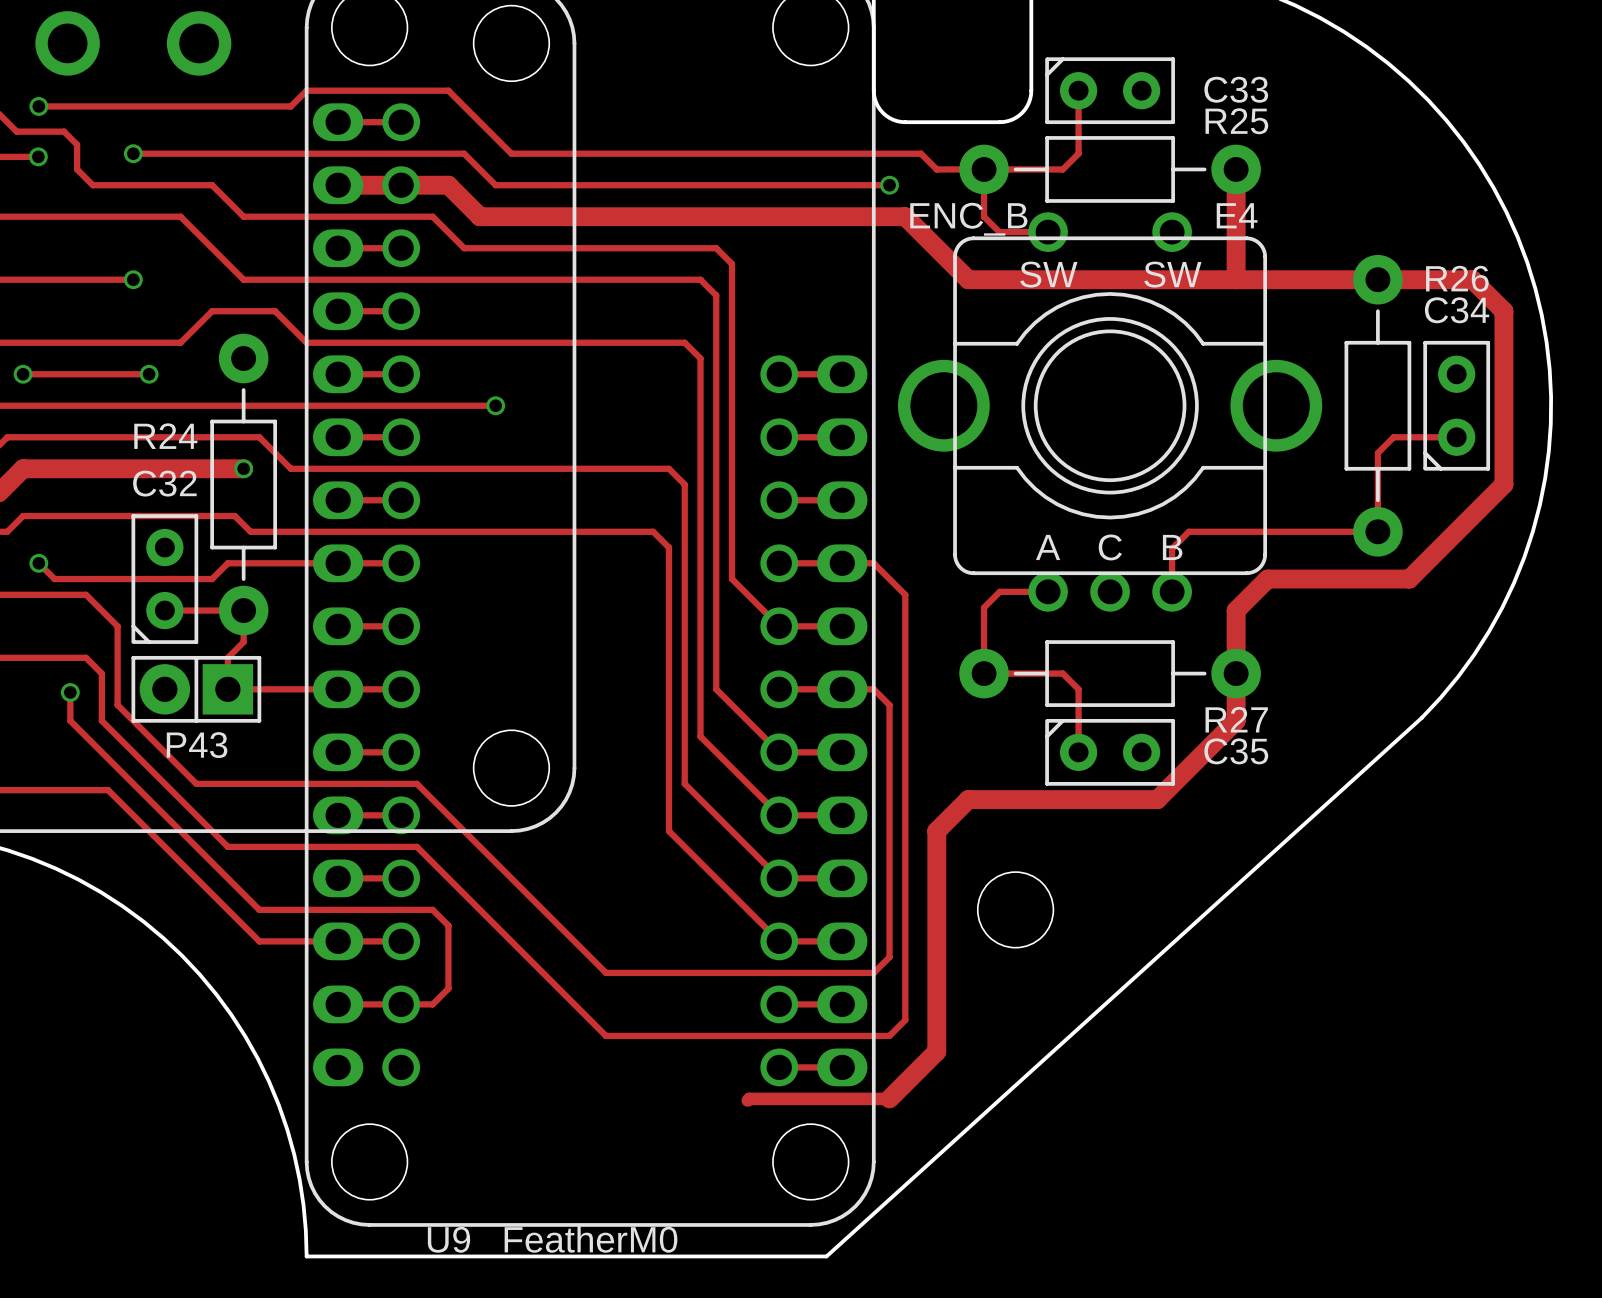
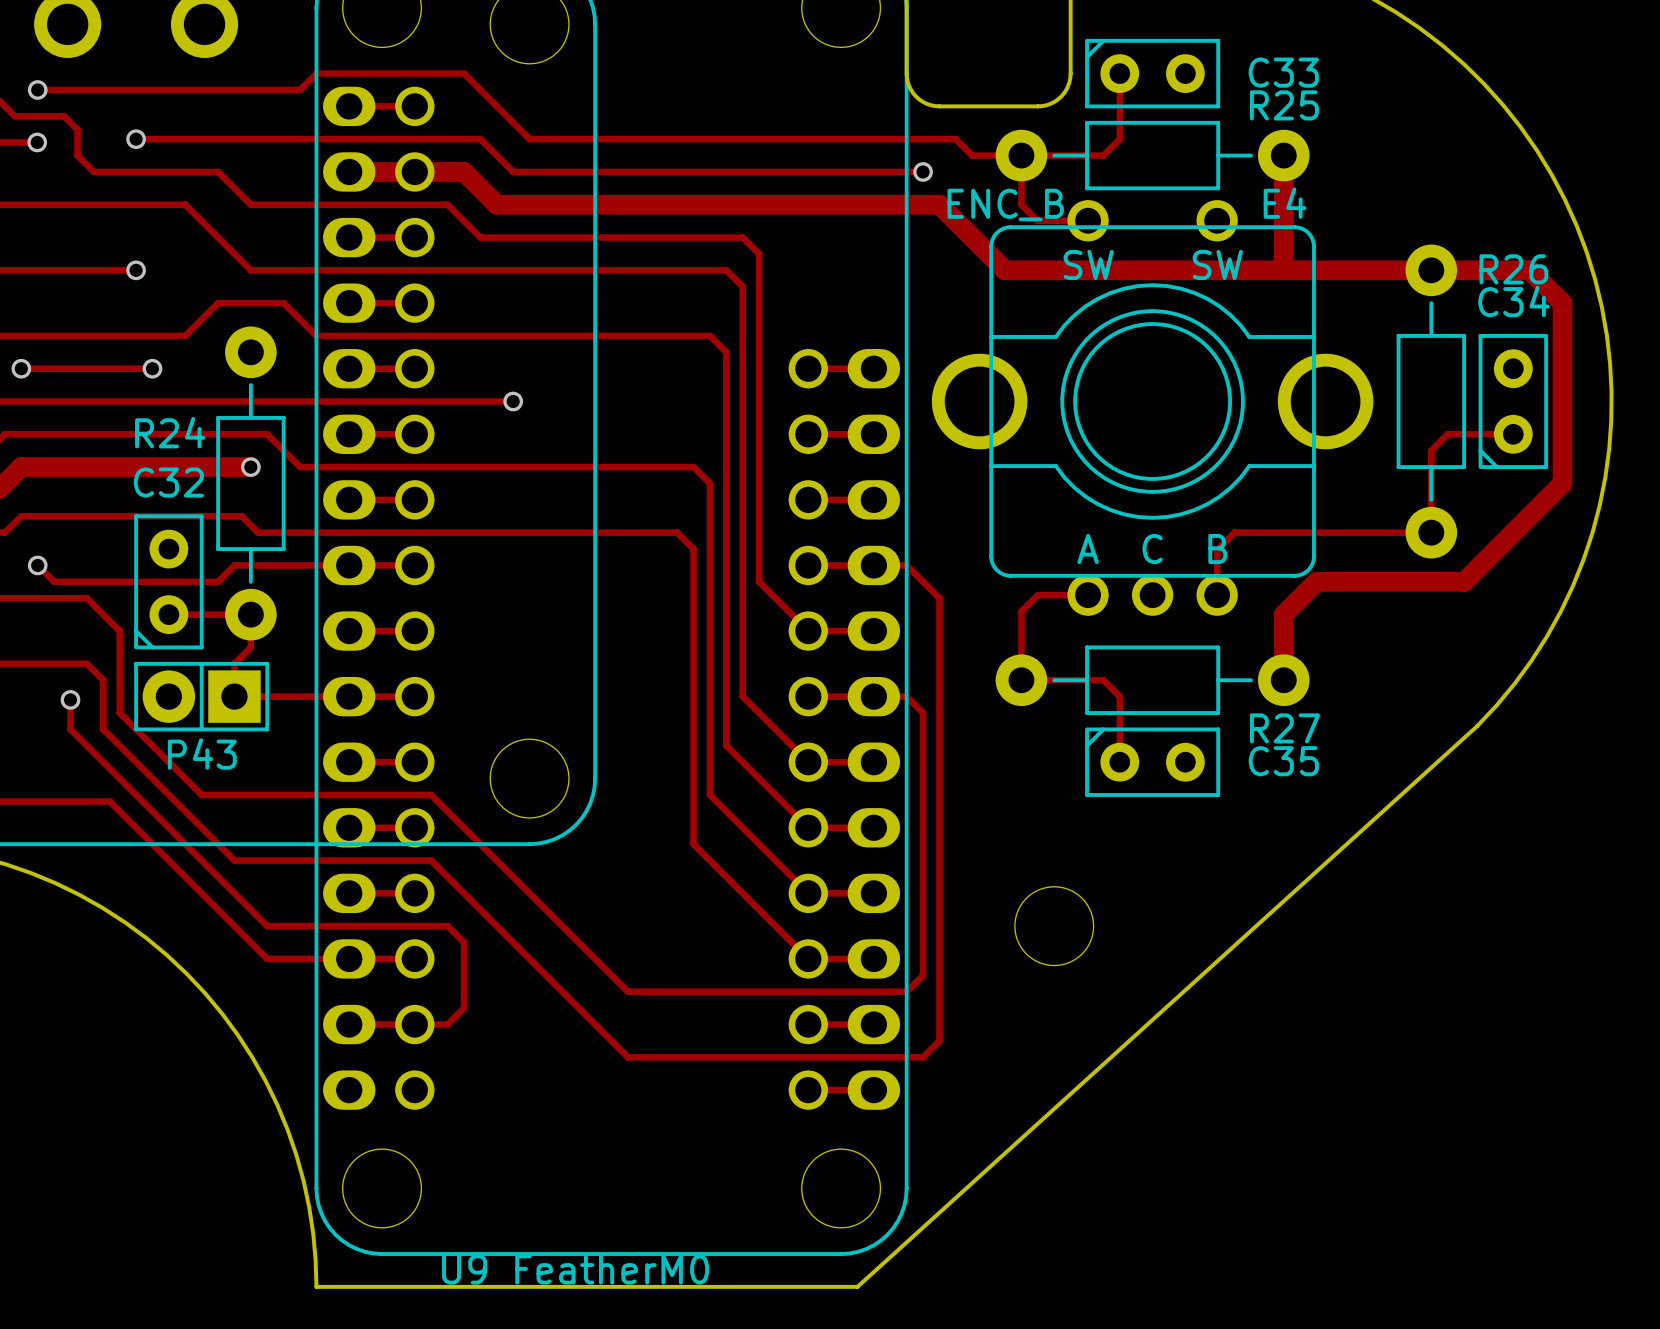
track: (1236, 673) (1236, 720) (1157, 799) (968, 799) (936, 831) (936, 1051) -> none
track: (936, 1051) (889, 1100) (747, 1100) (749, 1098) (889, 1098) -> none
track: (936, 1051) (889, 1098) -> none

